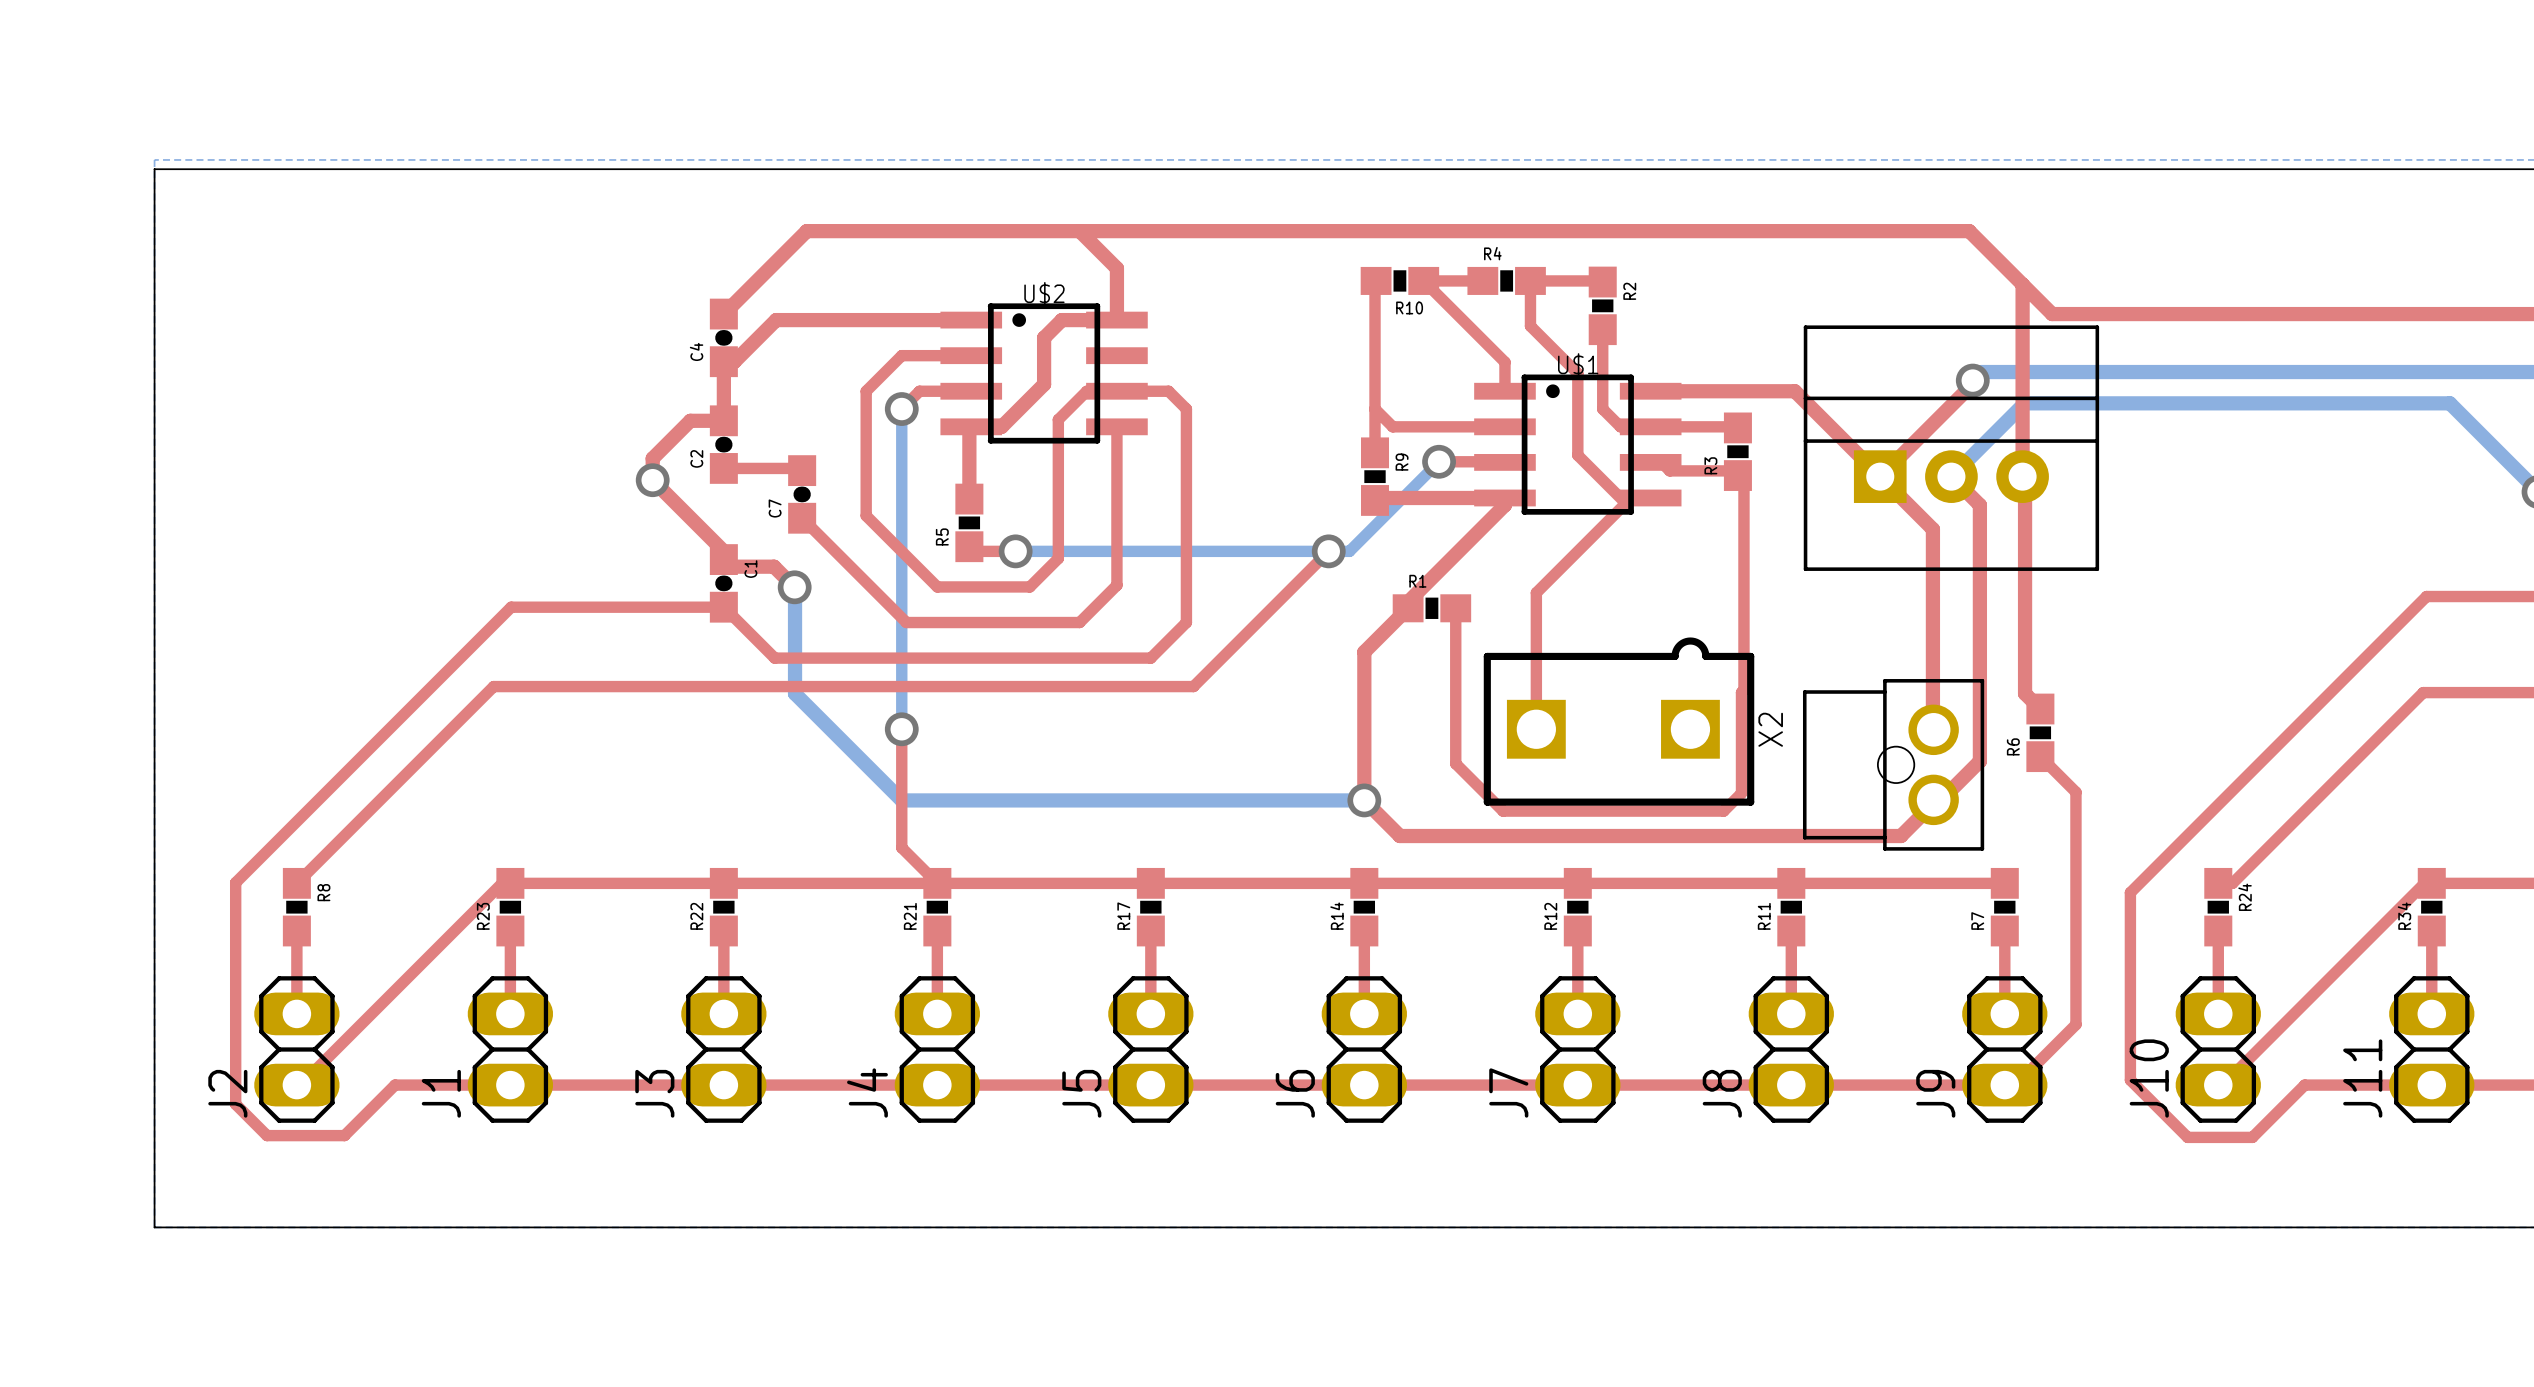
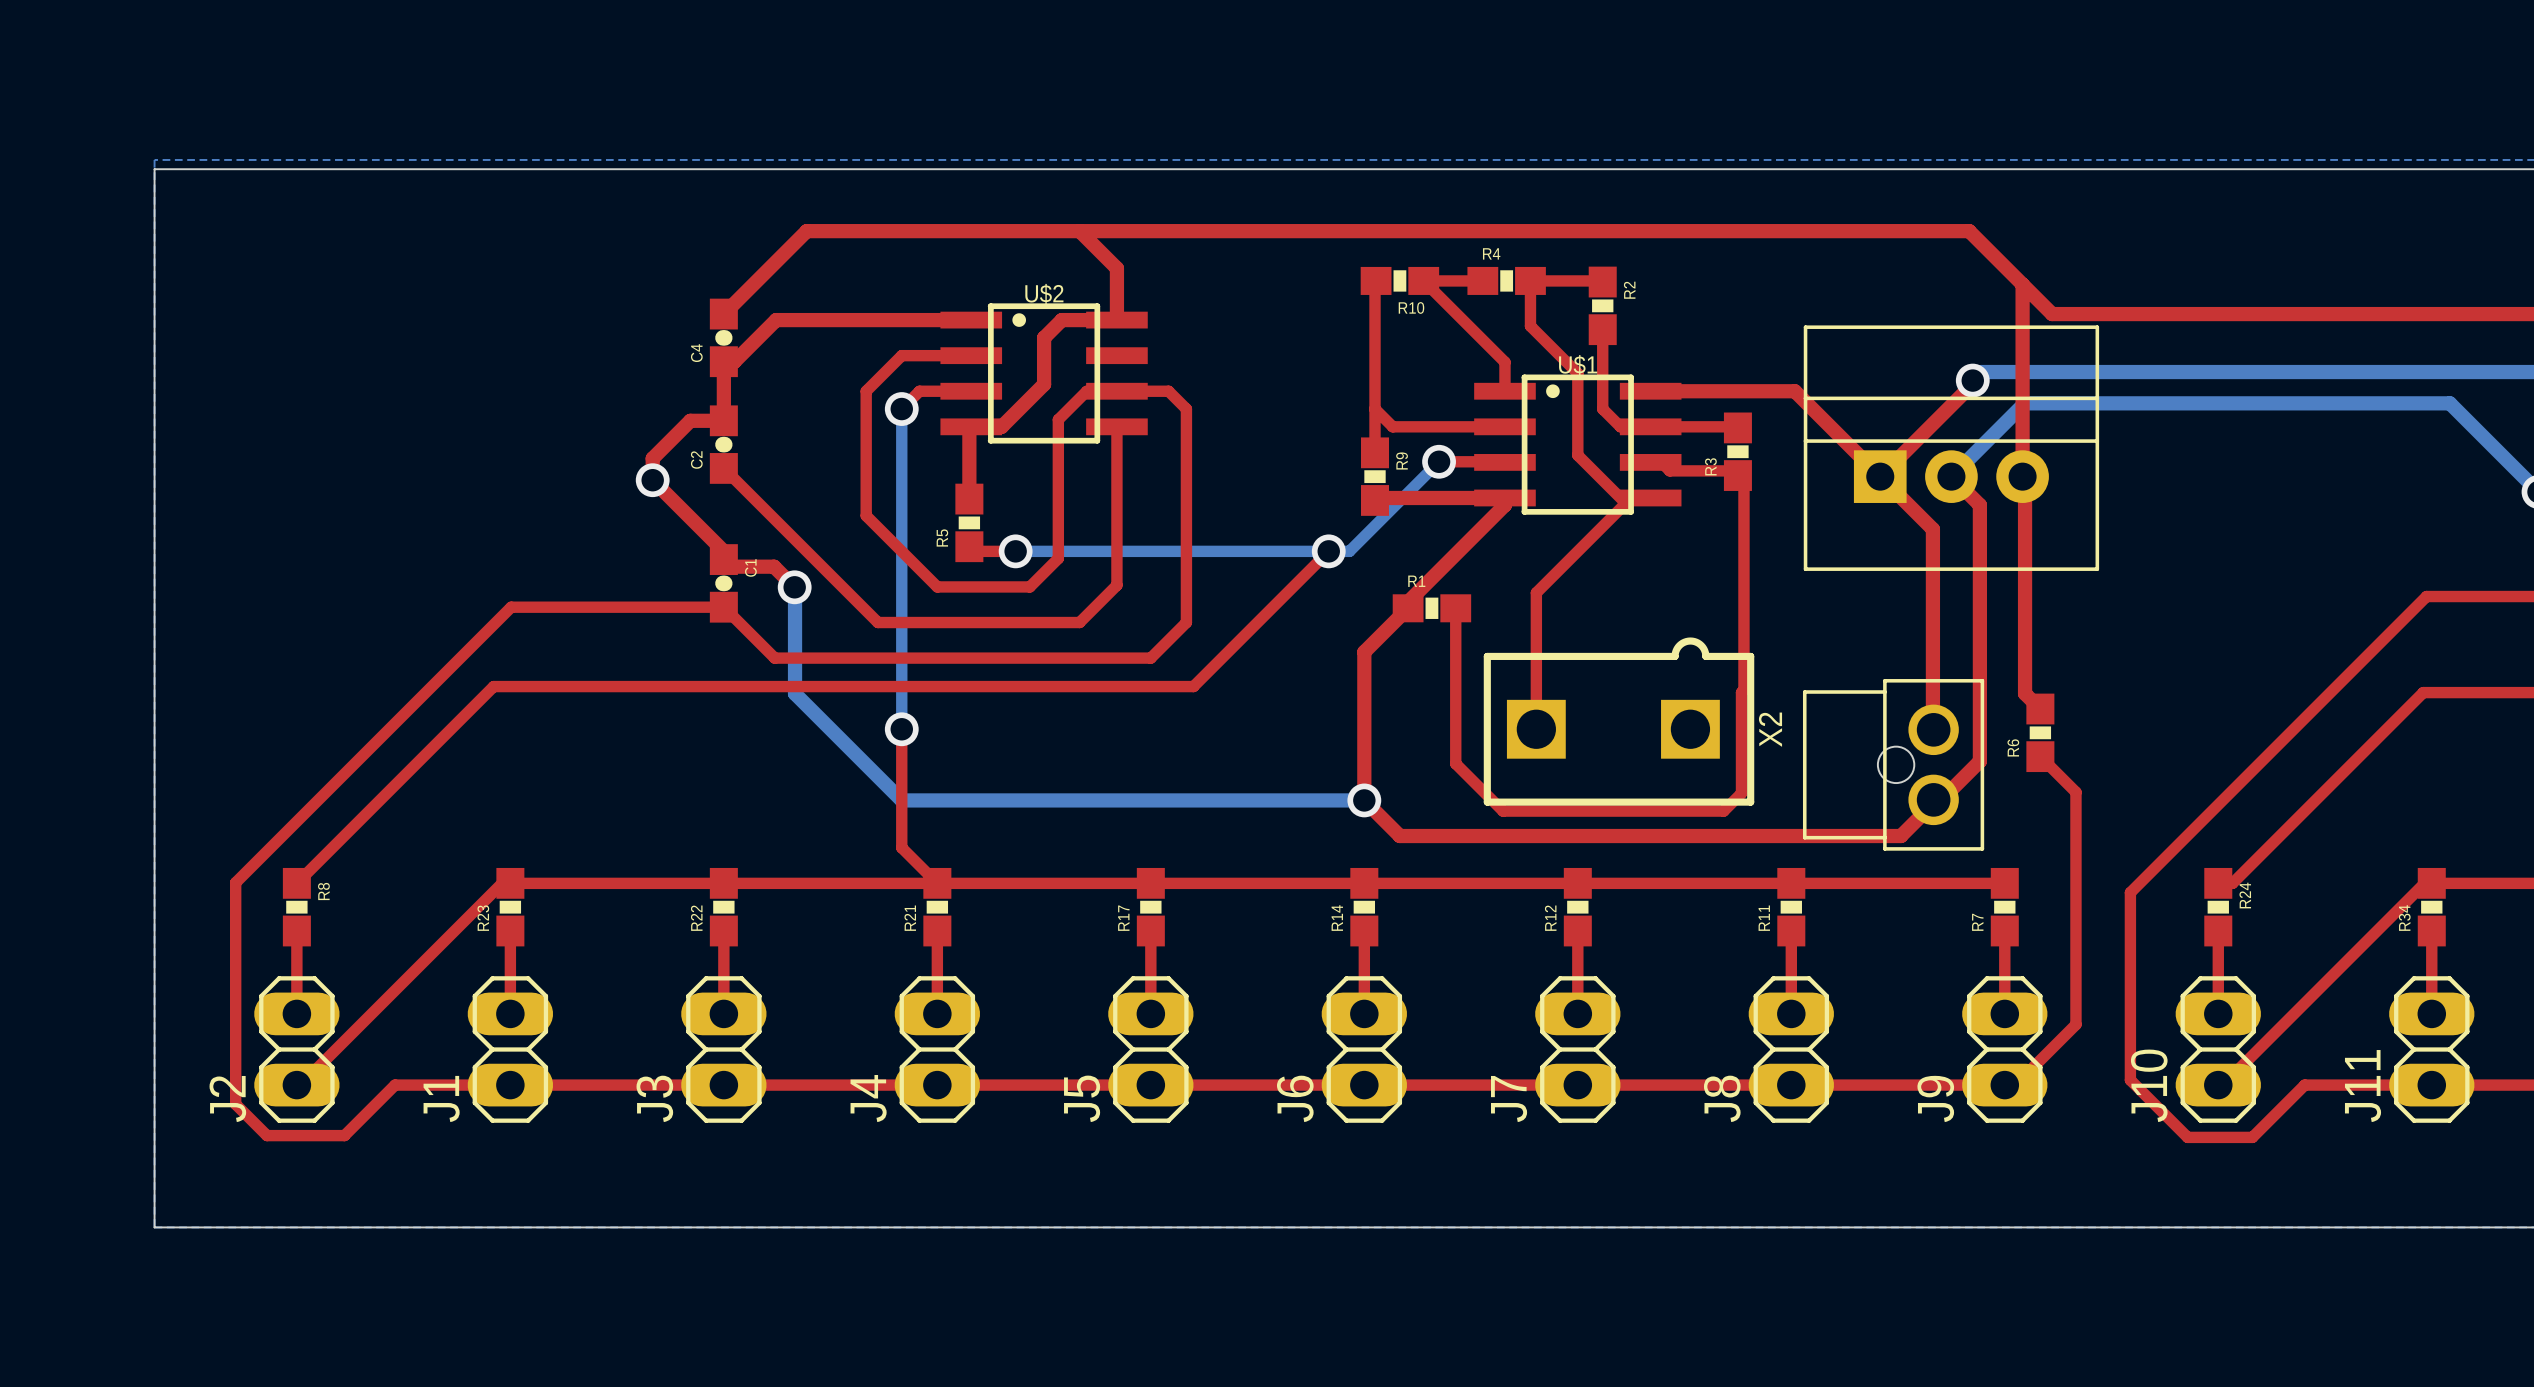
top track: (723, 468) (799, 468) (802, 470) -> none
C7: (802, 494) -> none
top track: (802, 518) (906, 622) -> (723, 468) (877, 622) (906, 622)

